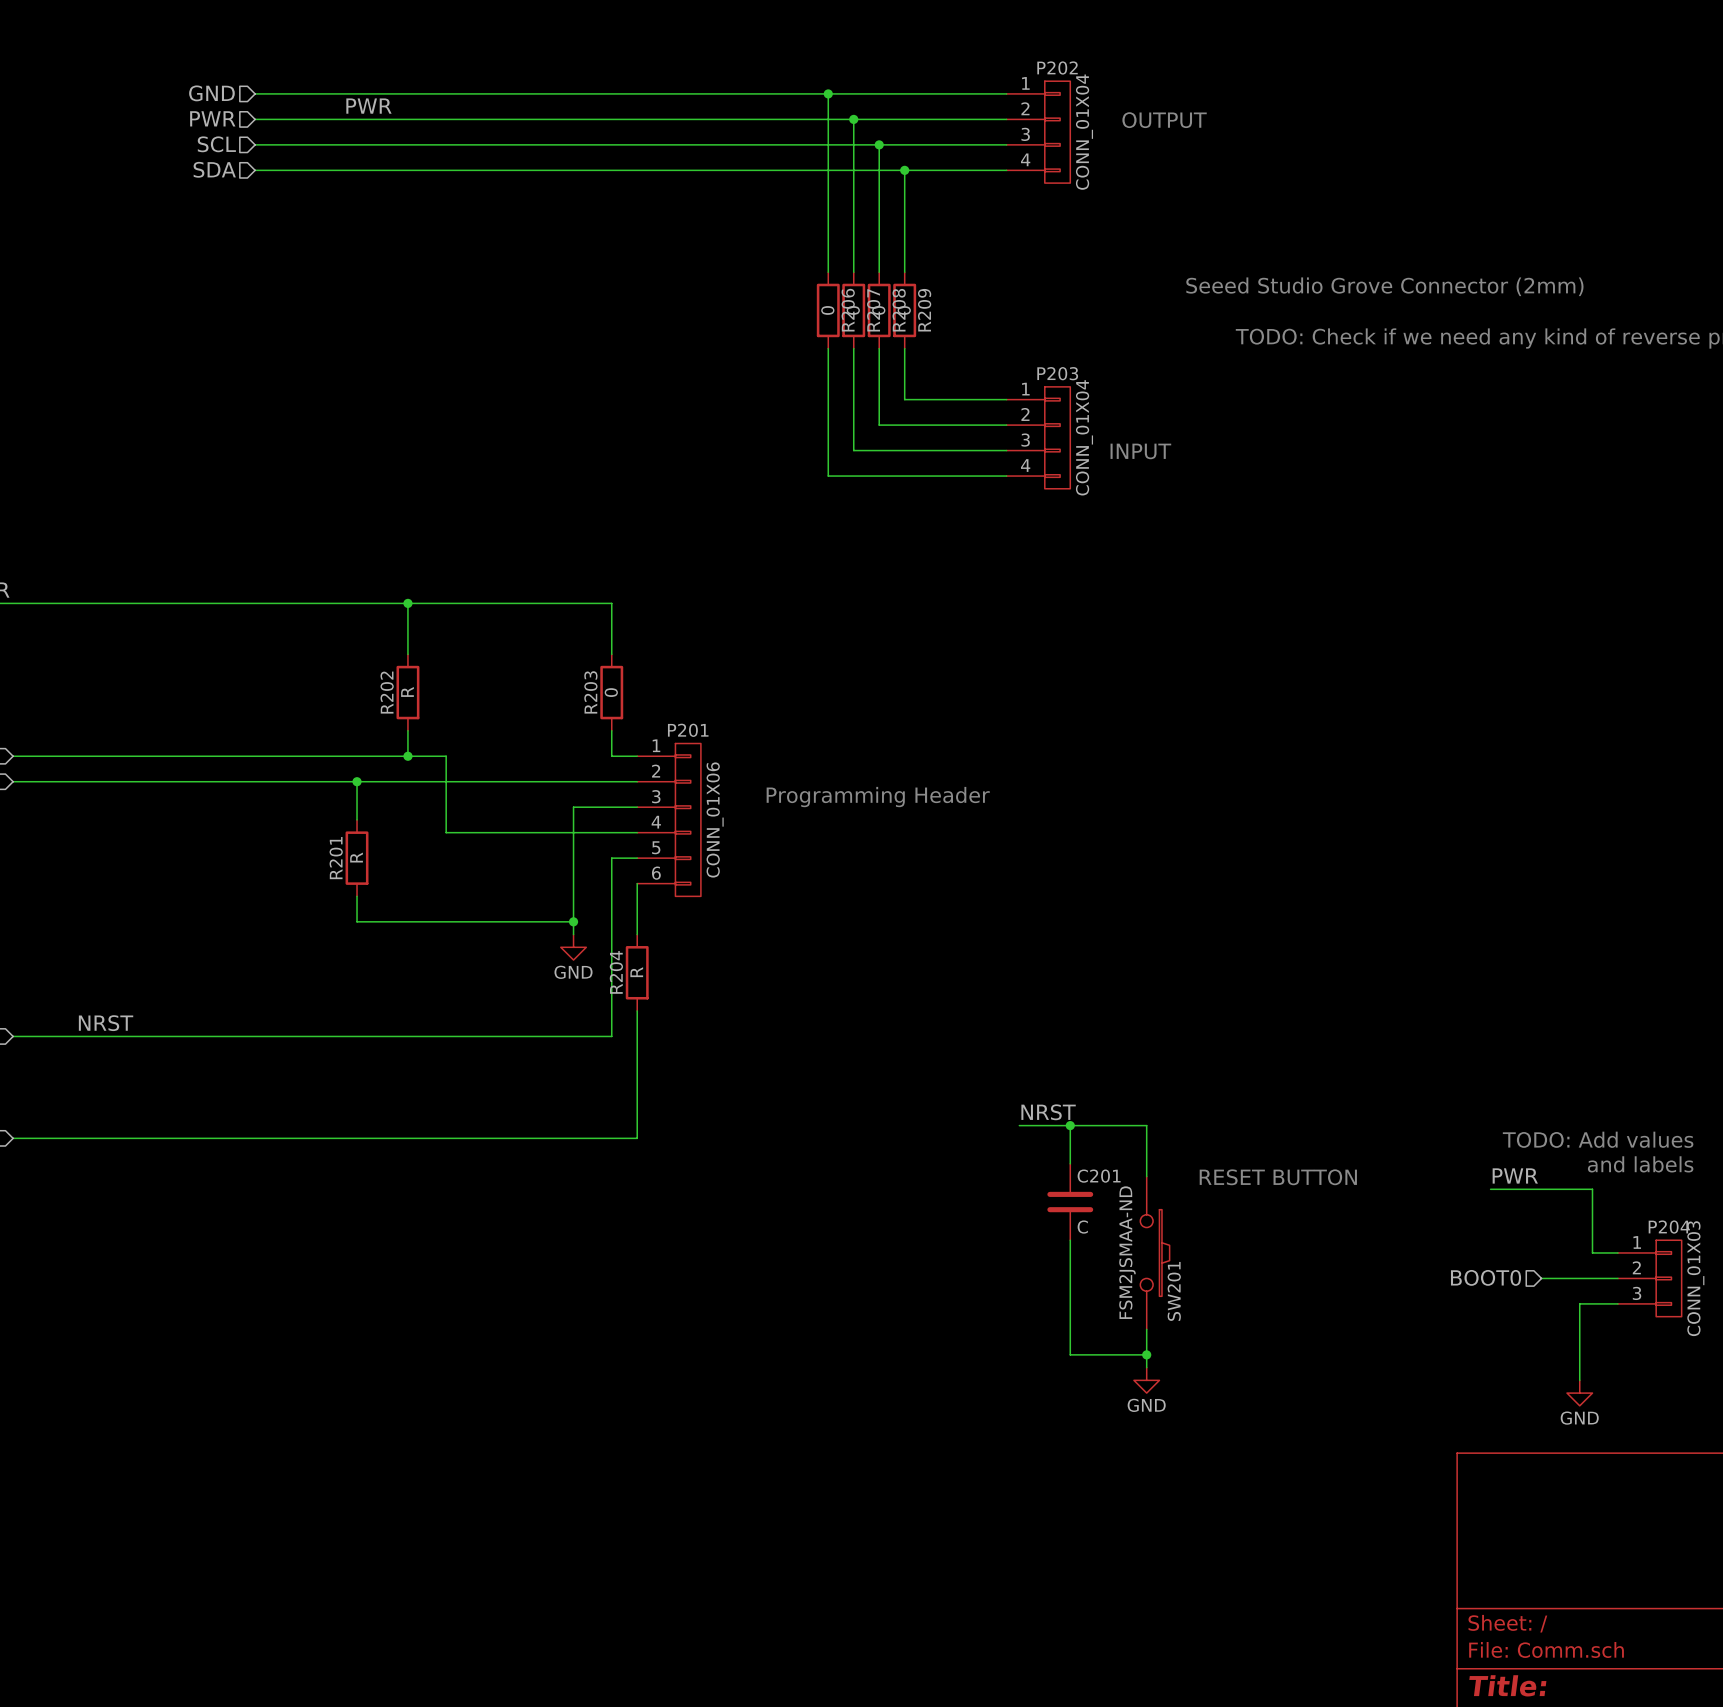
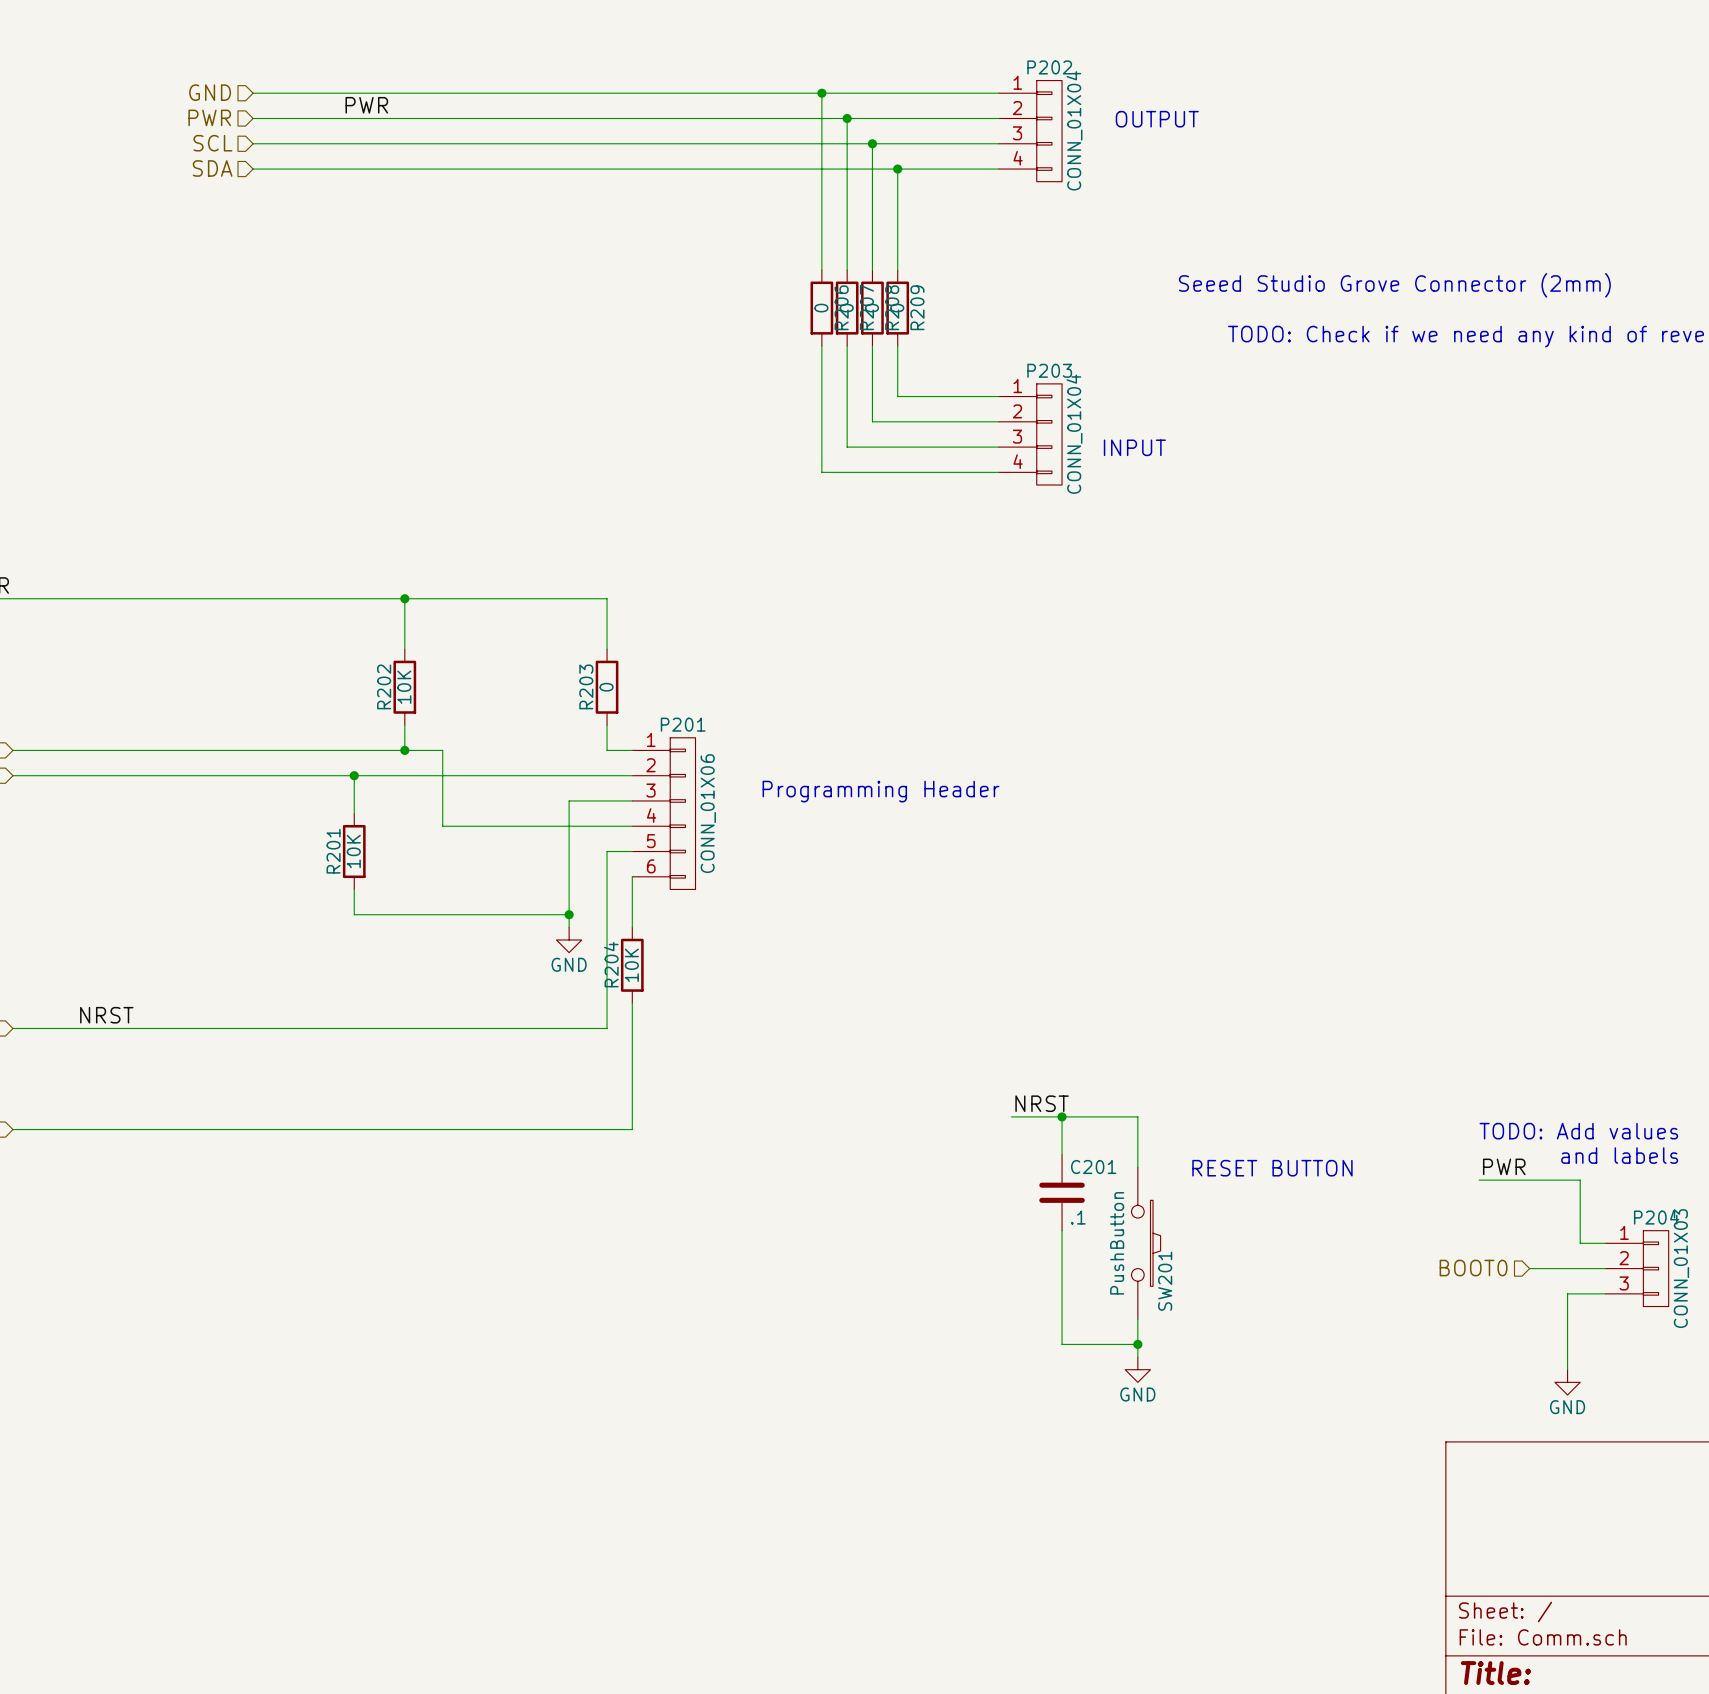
R202 value: R (407, 691) -> 10K (404, 687)
R201 value: R (356, 857) -> 10K (353, 851)
R204 value: R (636, 972) -> 10K (631, 965)
C201 value: C (1082, 1227) -> .1 (1078, 1217)
SW201 value: FSM2JSMAA-ND (1127, 1252) -> PushButton (1117, 1243)

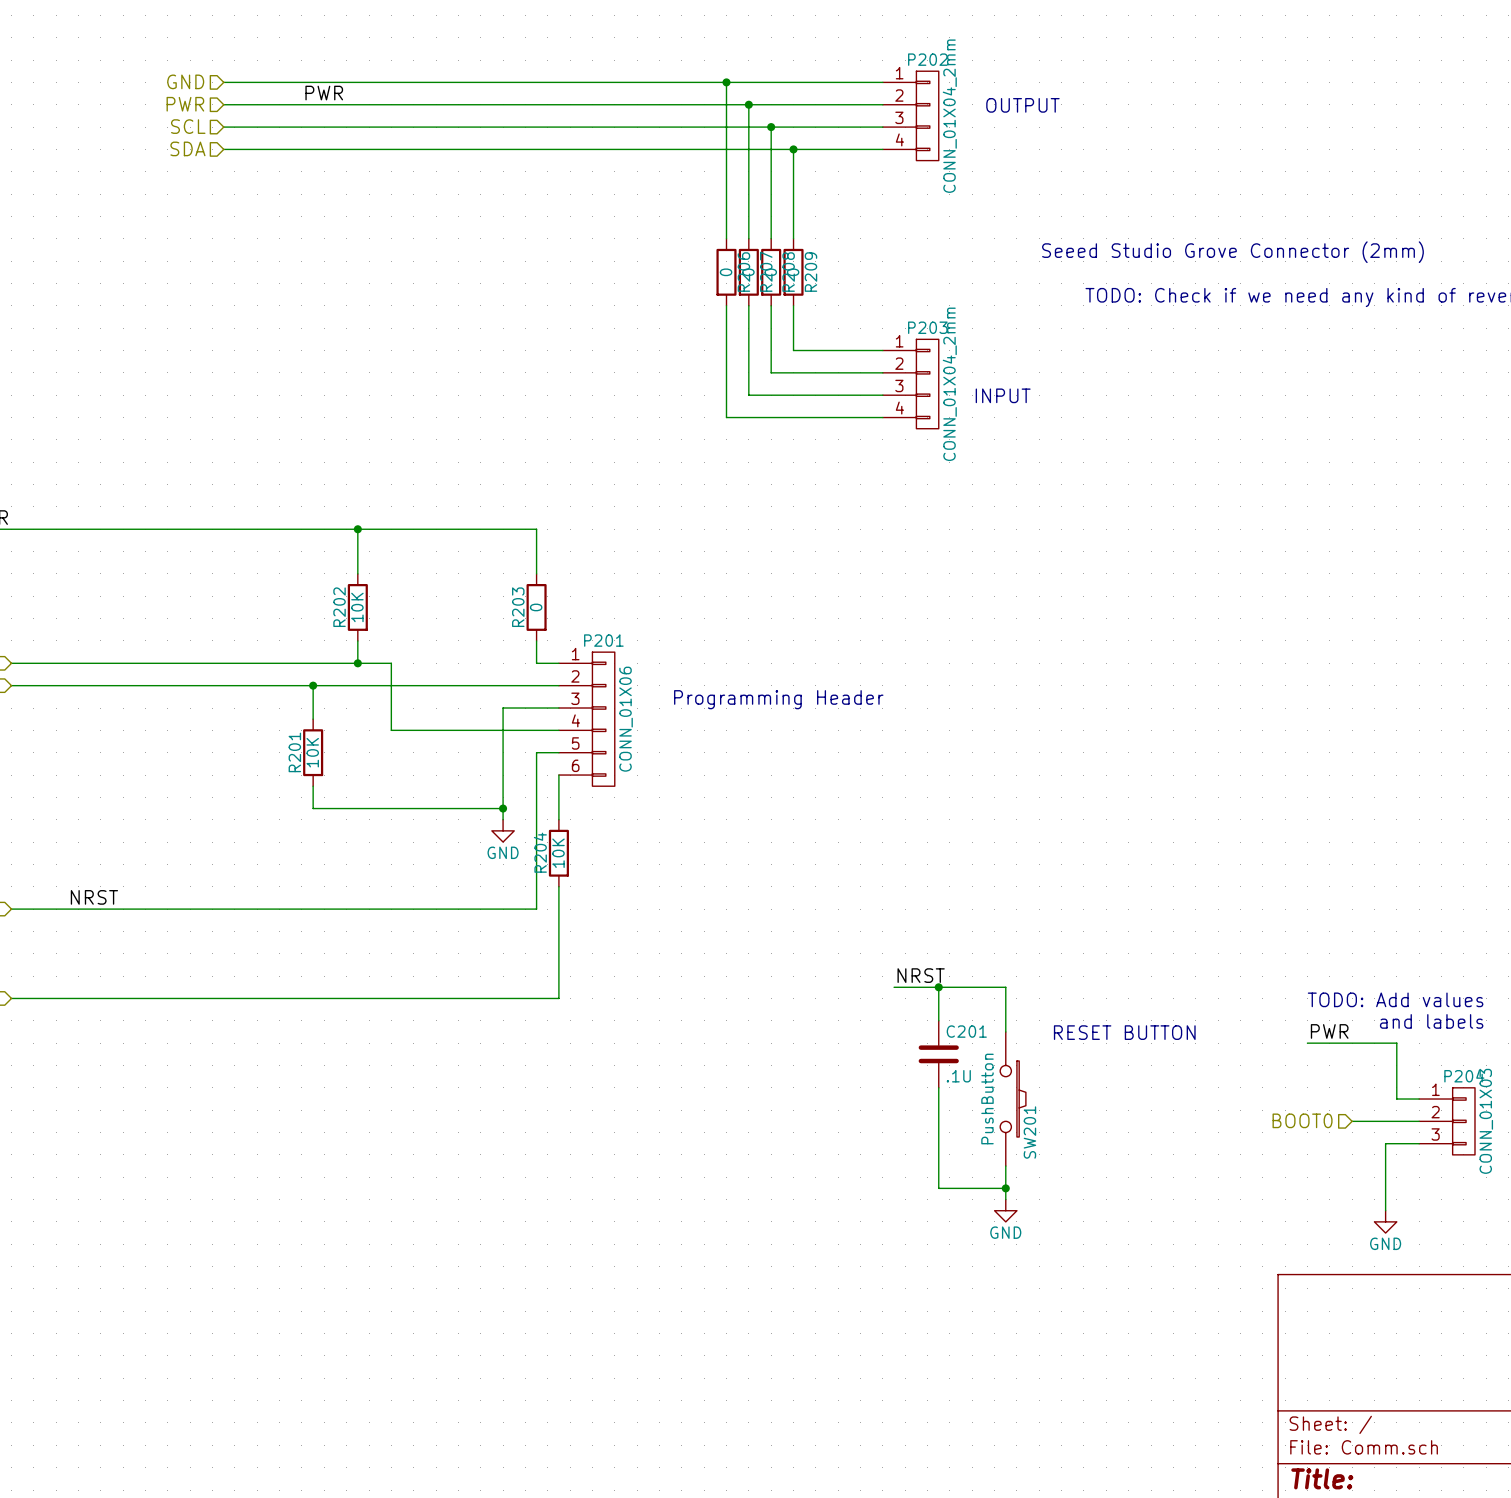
P202 value: CONN_01X04 (1074, 130) -> CONN_01X04_2mm (949, 116)
P203 value: CONN_01X04 (1074, 434) -> CONN_01X04_2mm (949, 384)
C201 value: .1 (1078, 1217) -> .1U (958, 1076)

